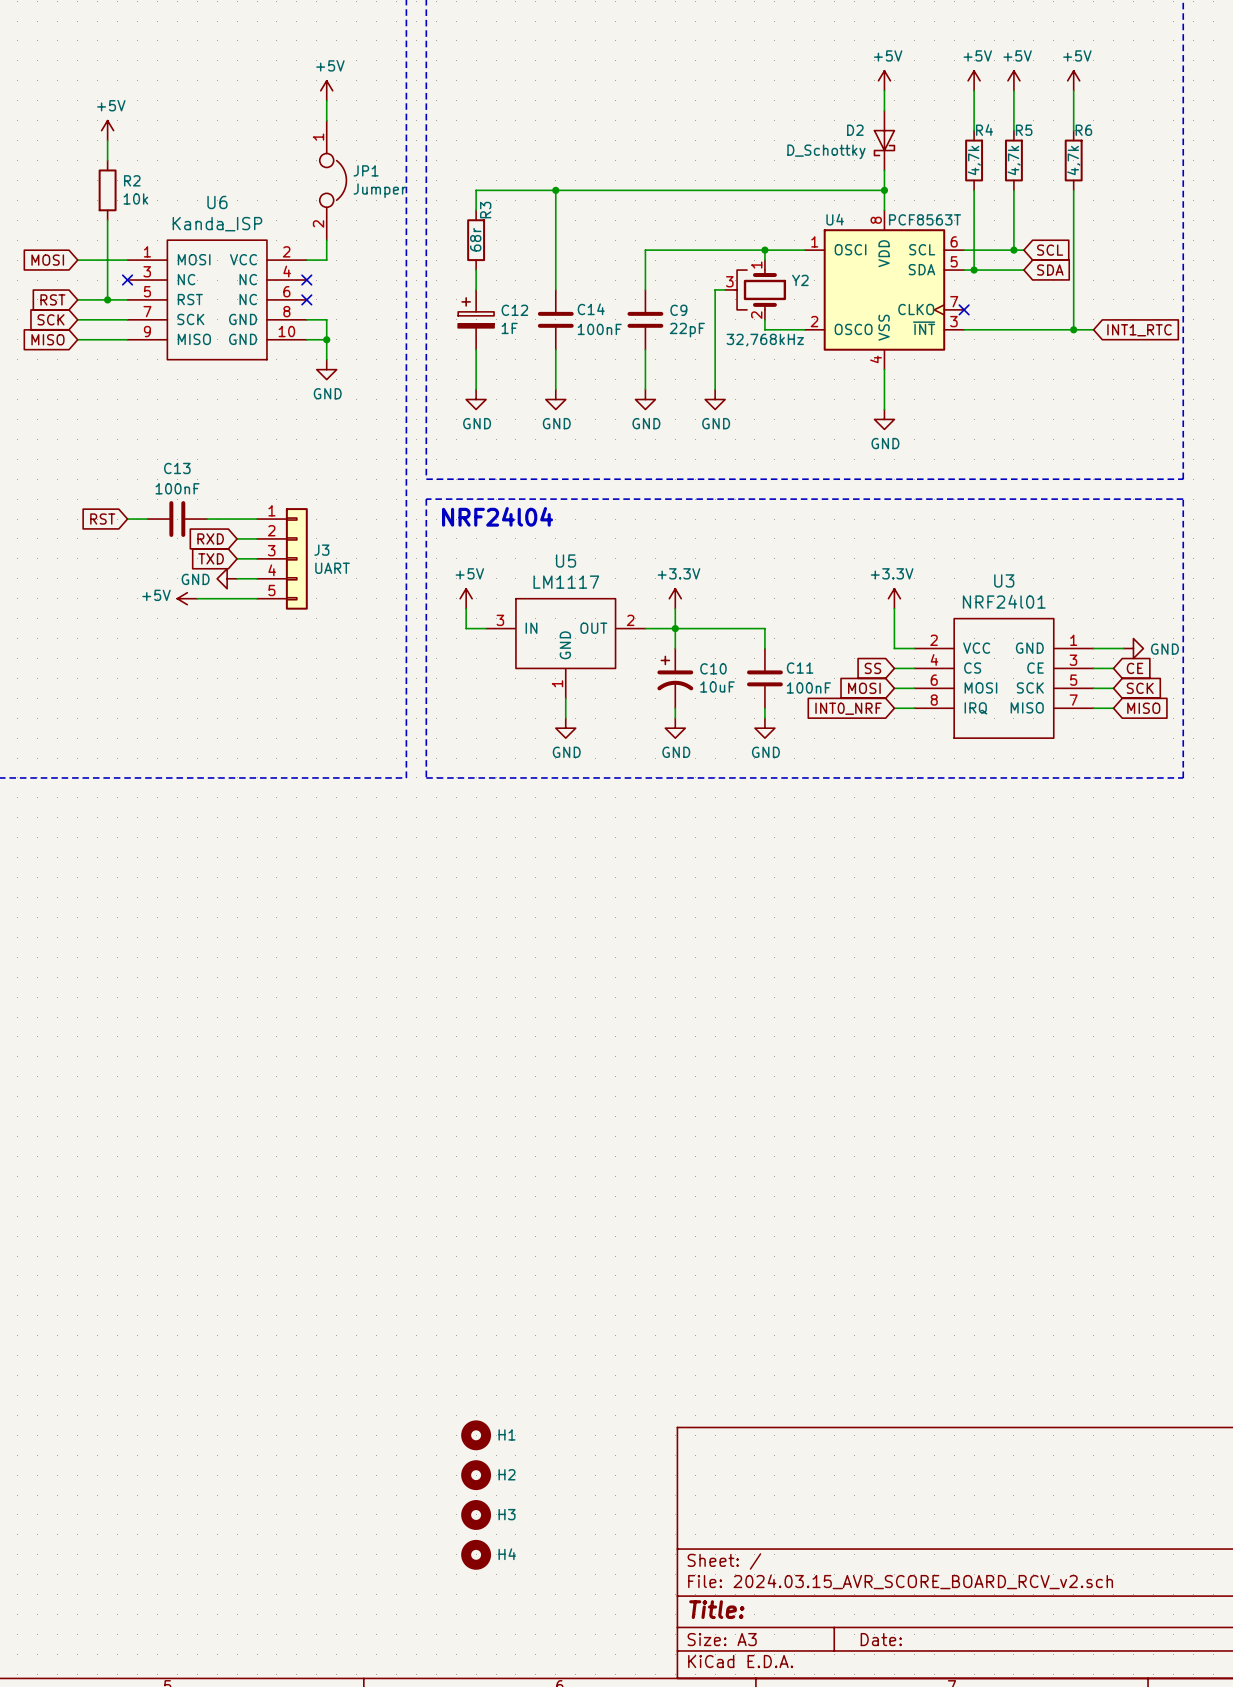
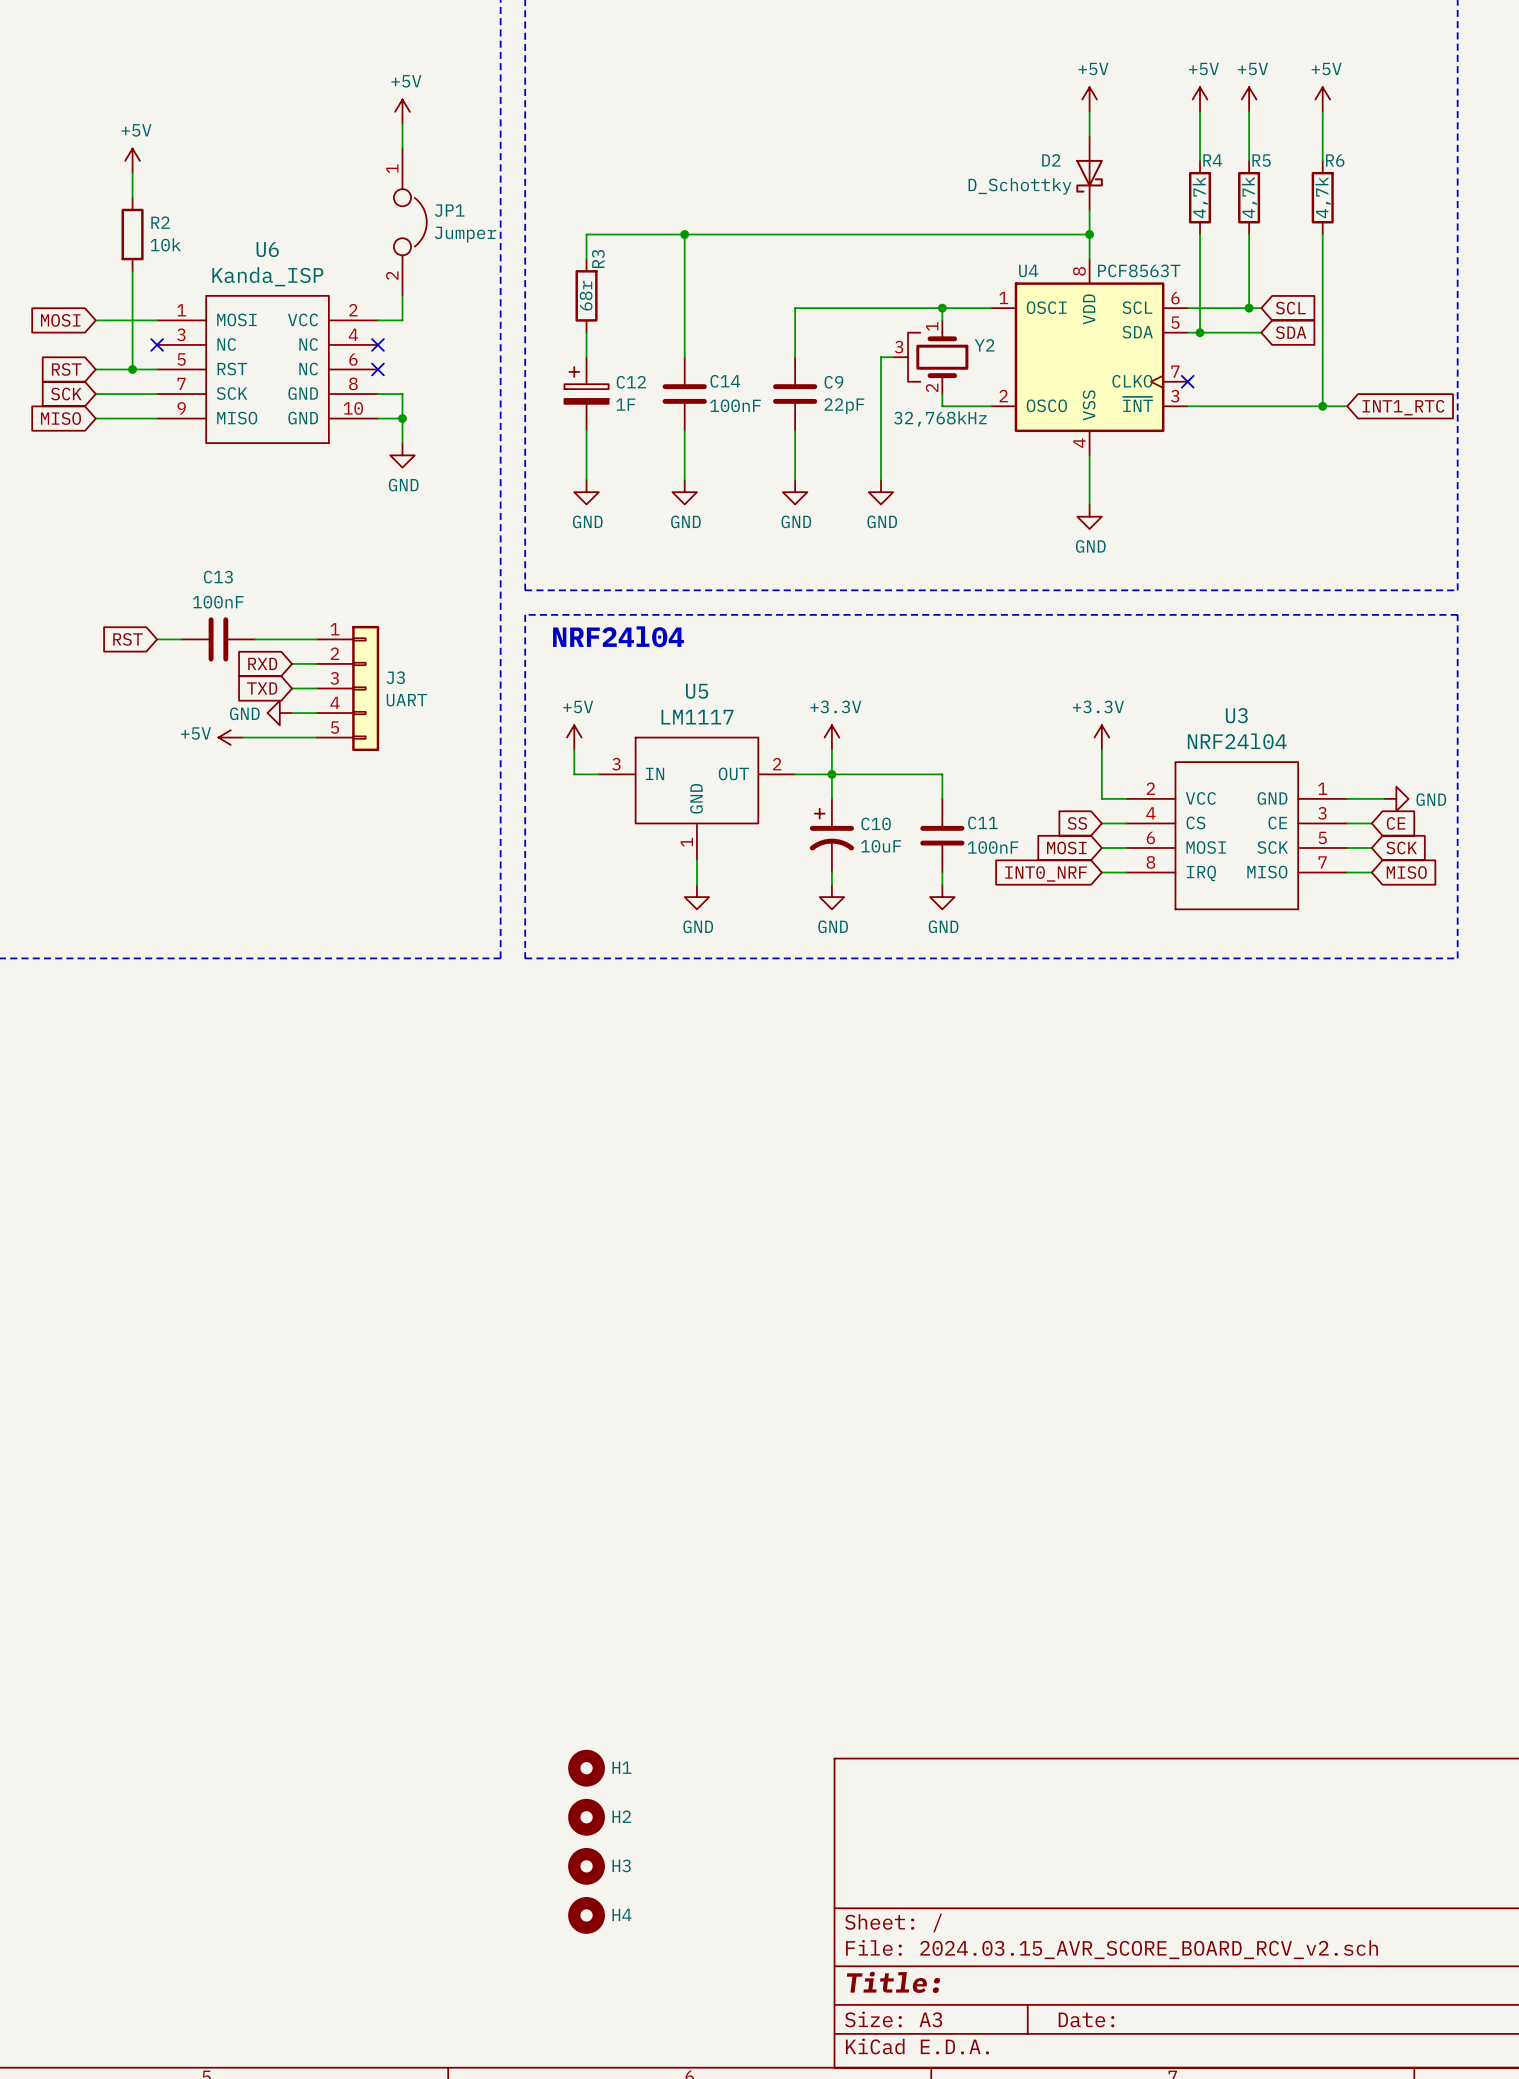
U3 value: NRF24l01 (1004, 601) -> NRF24l04 (1237, 741)

